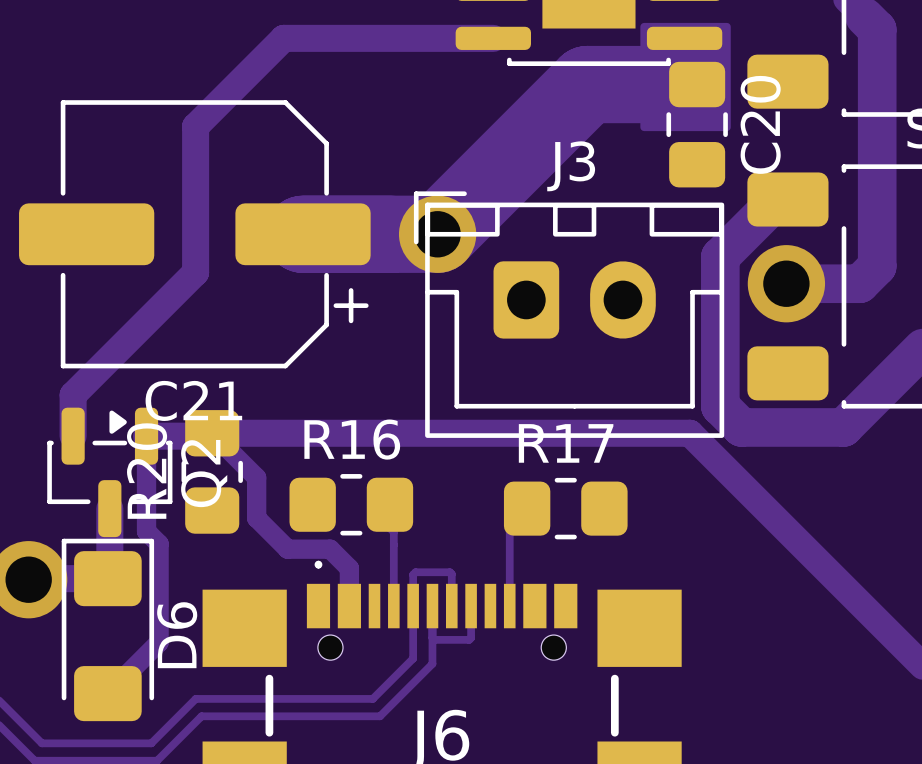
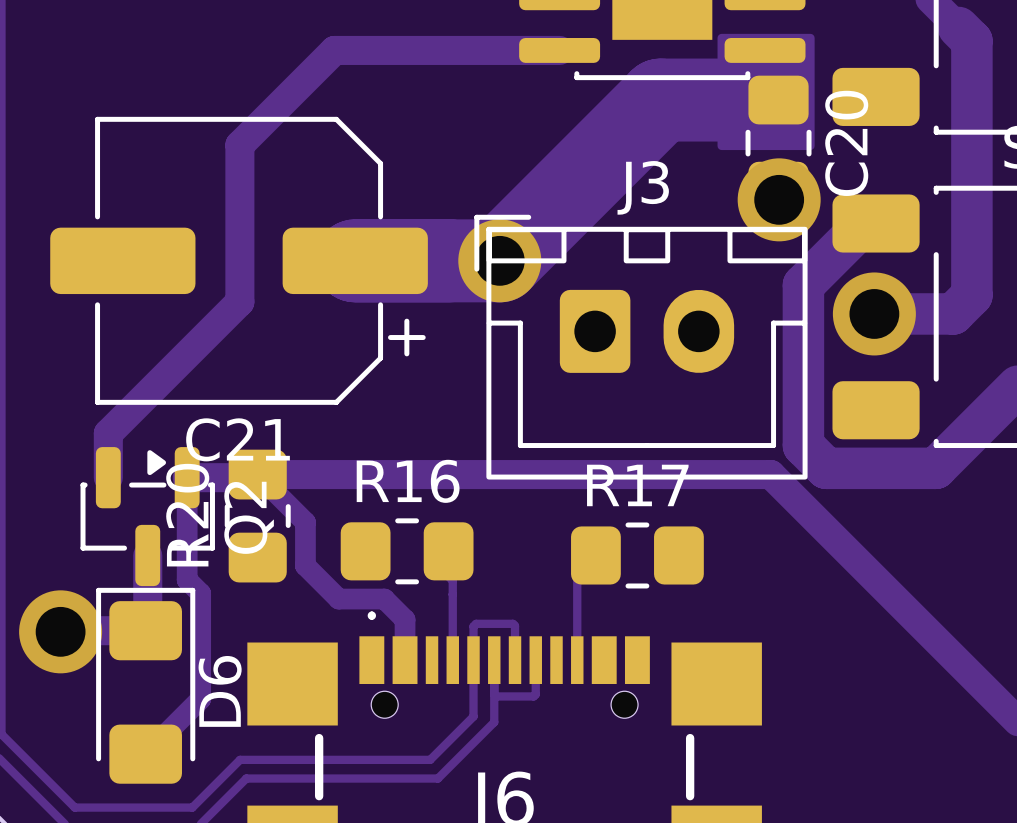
via: none -> (779, 199)

